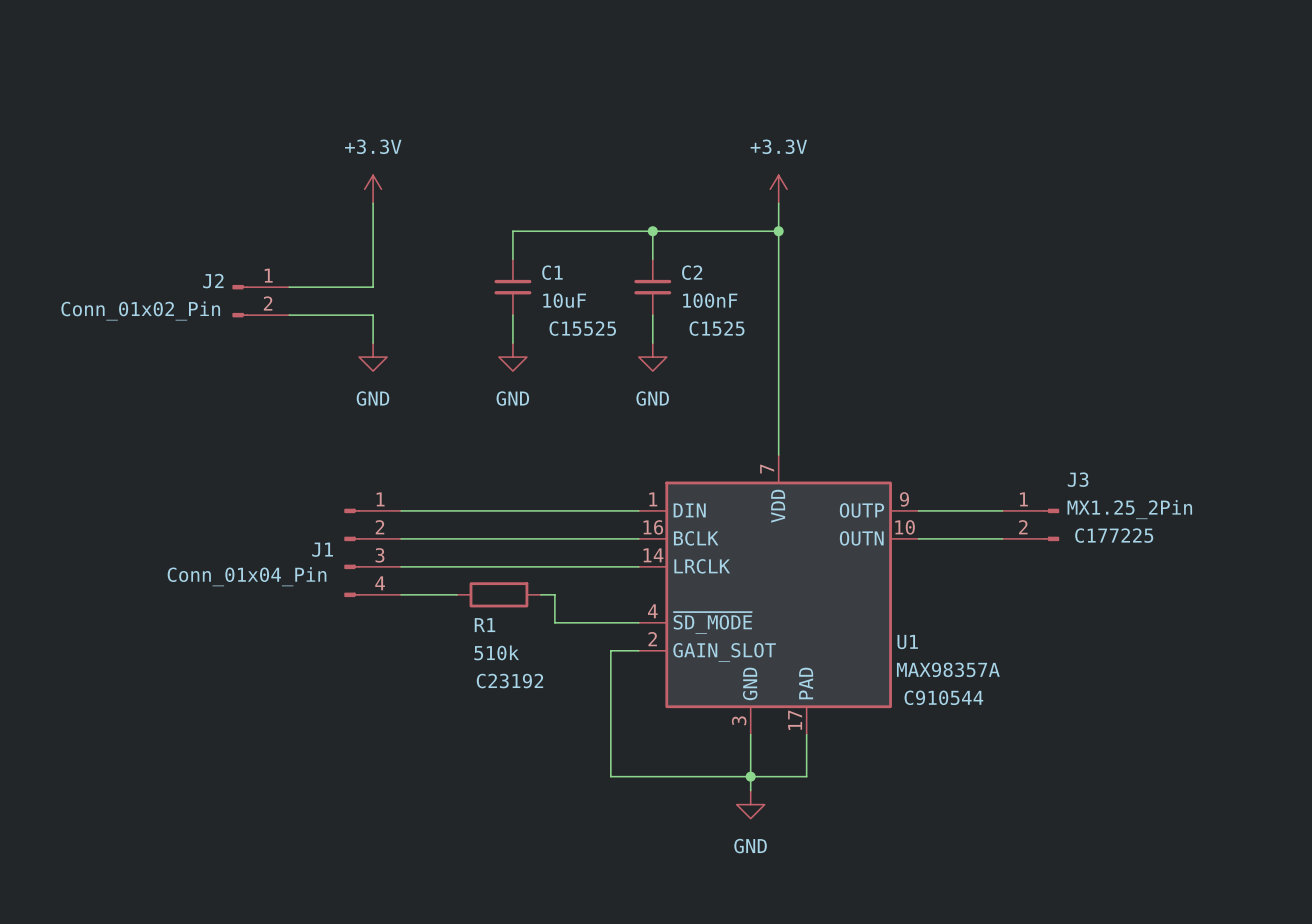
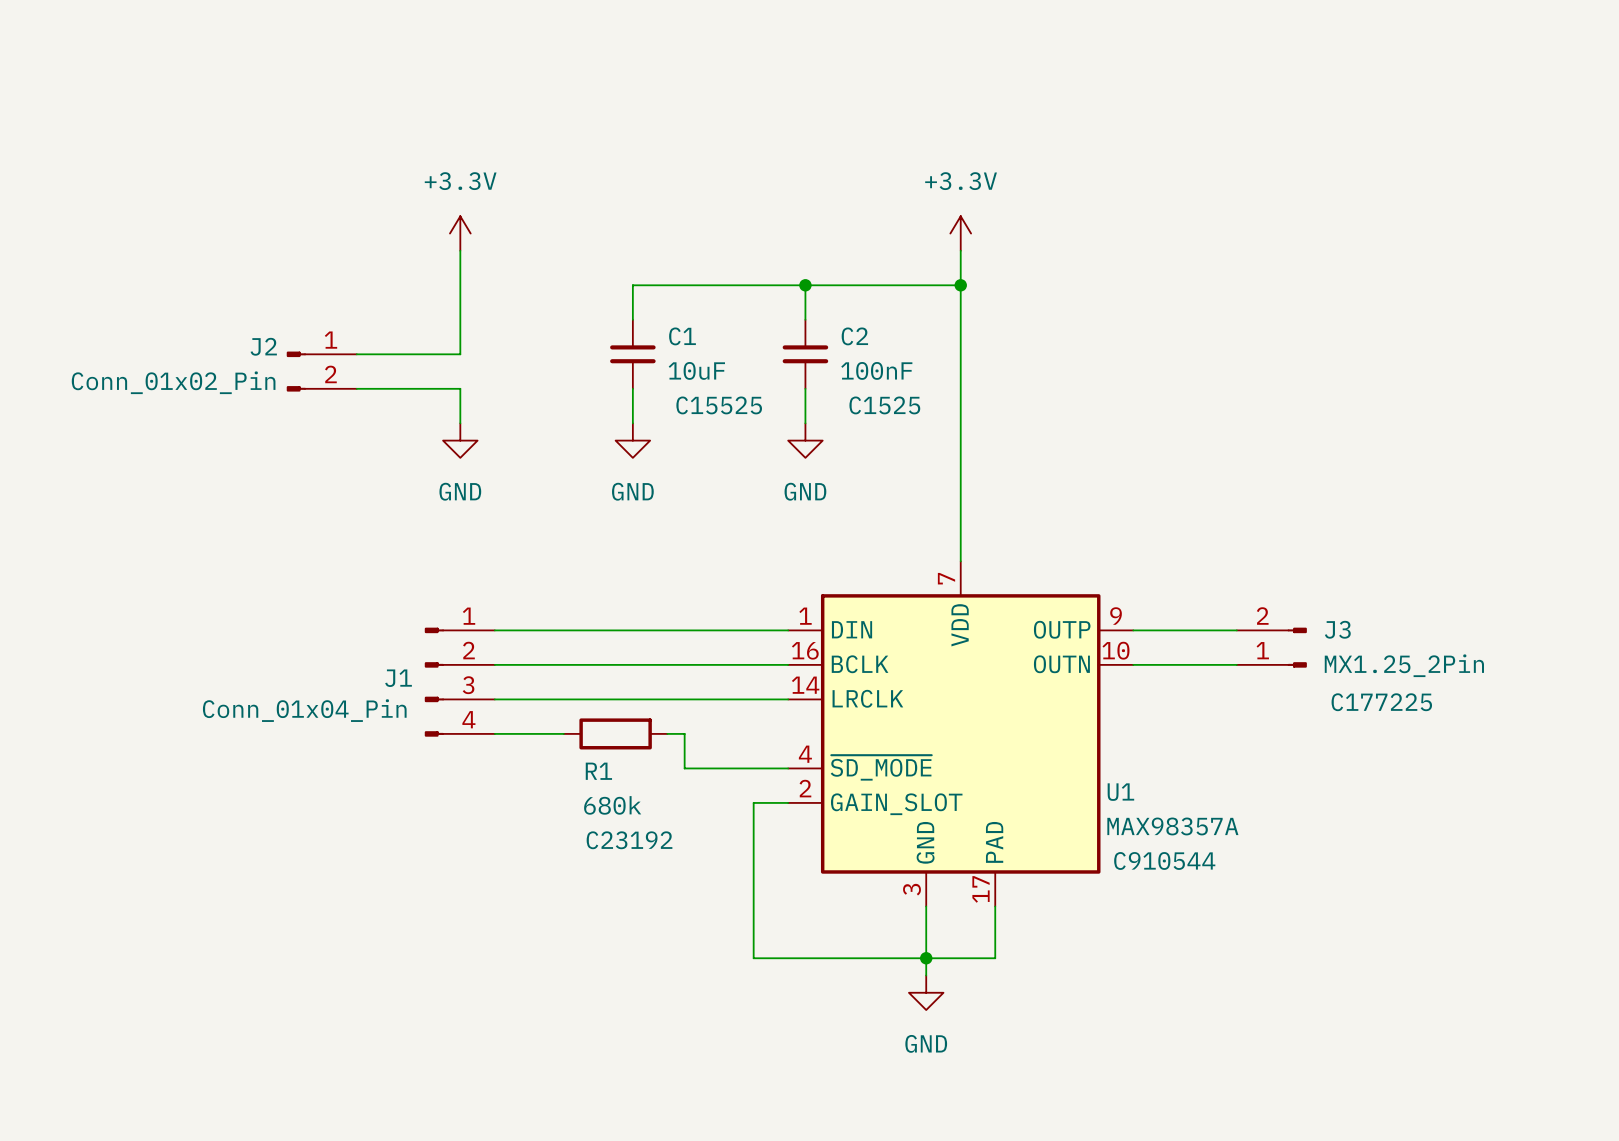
J3 name position: J3 (1078, 479) -> J3 (1337, 629)
J3 flip: as is (1051, 524) -> up-down (1297, 647)
J3 text position: C177225 (1114, 535) -> C177225 (1381, 702)
R1 value: 510k (496, 652) -> 680k (612, 805)

